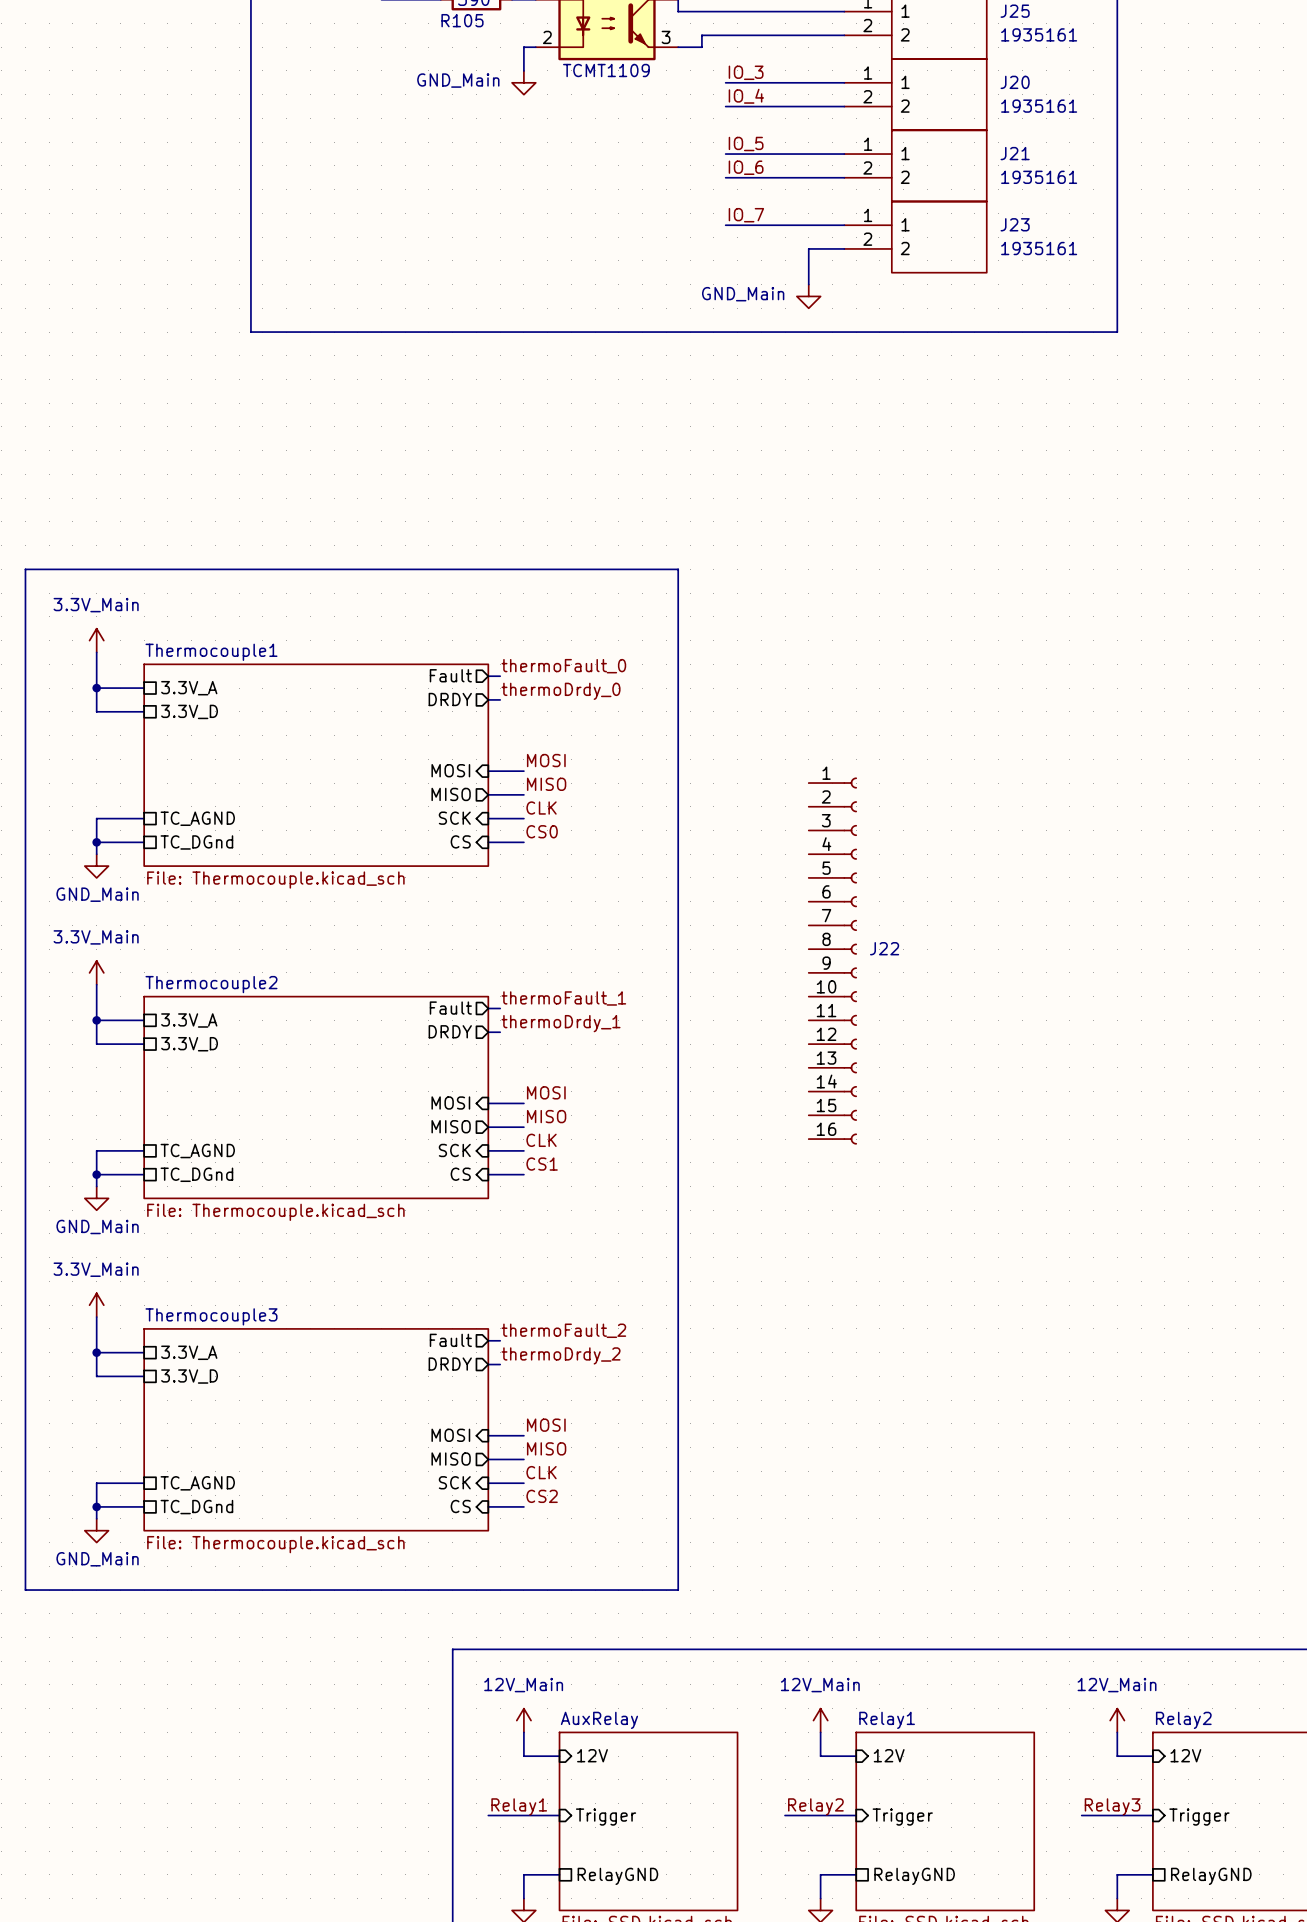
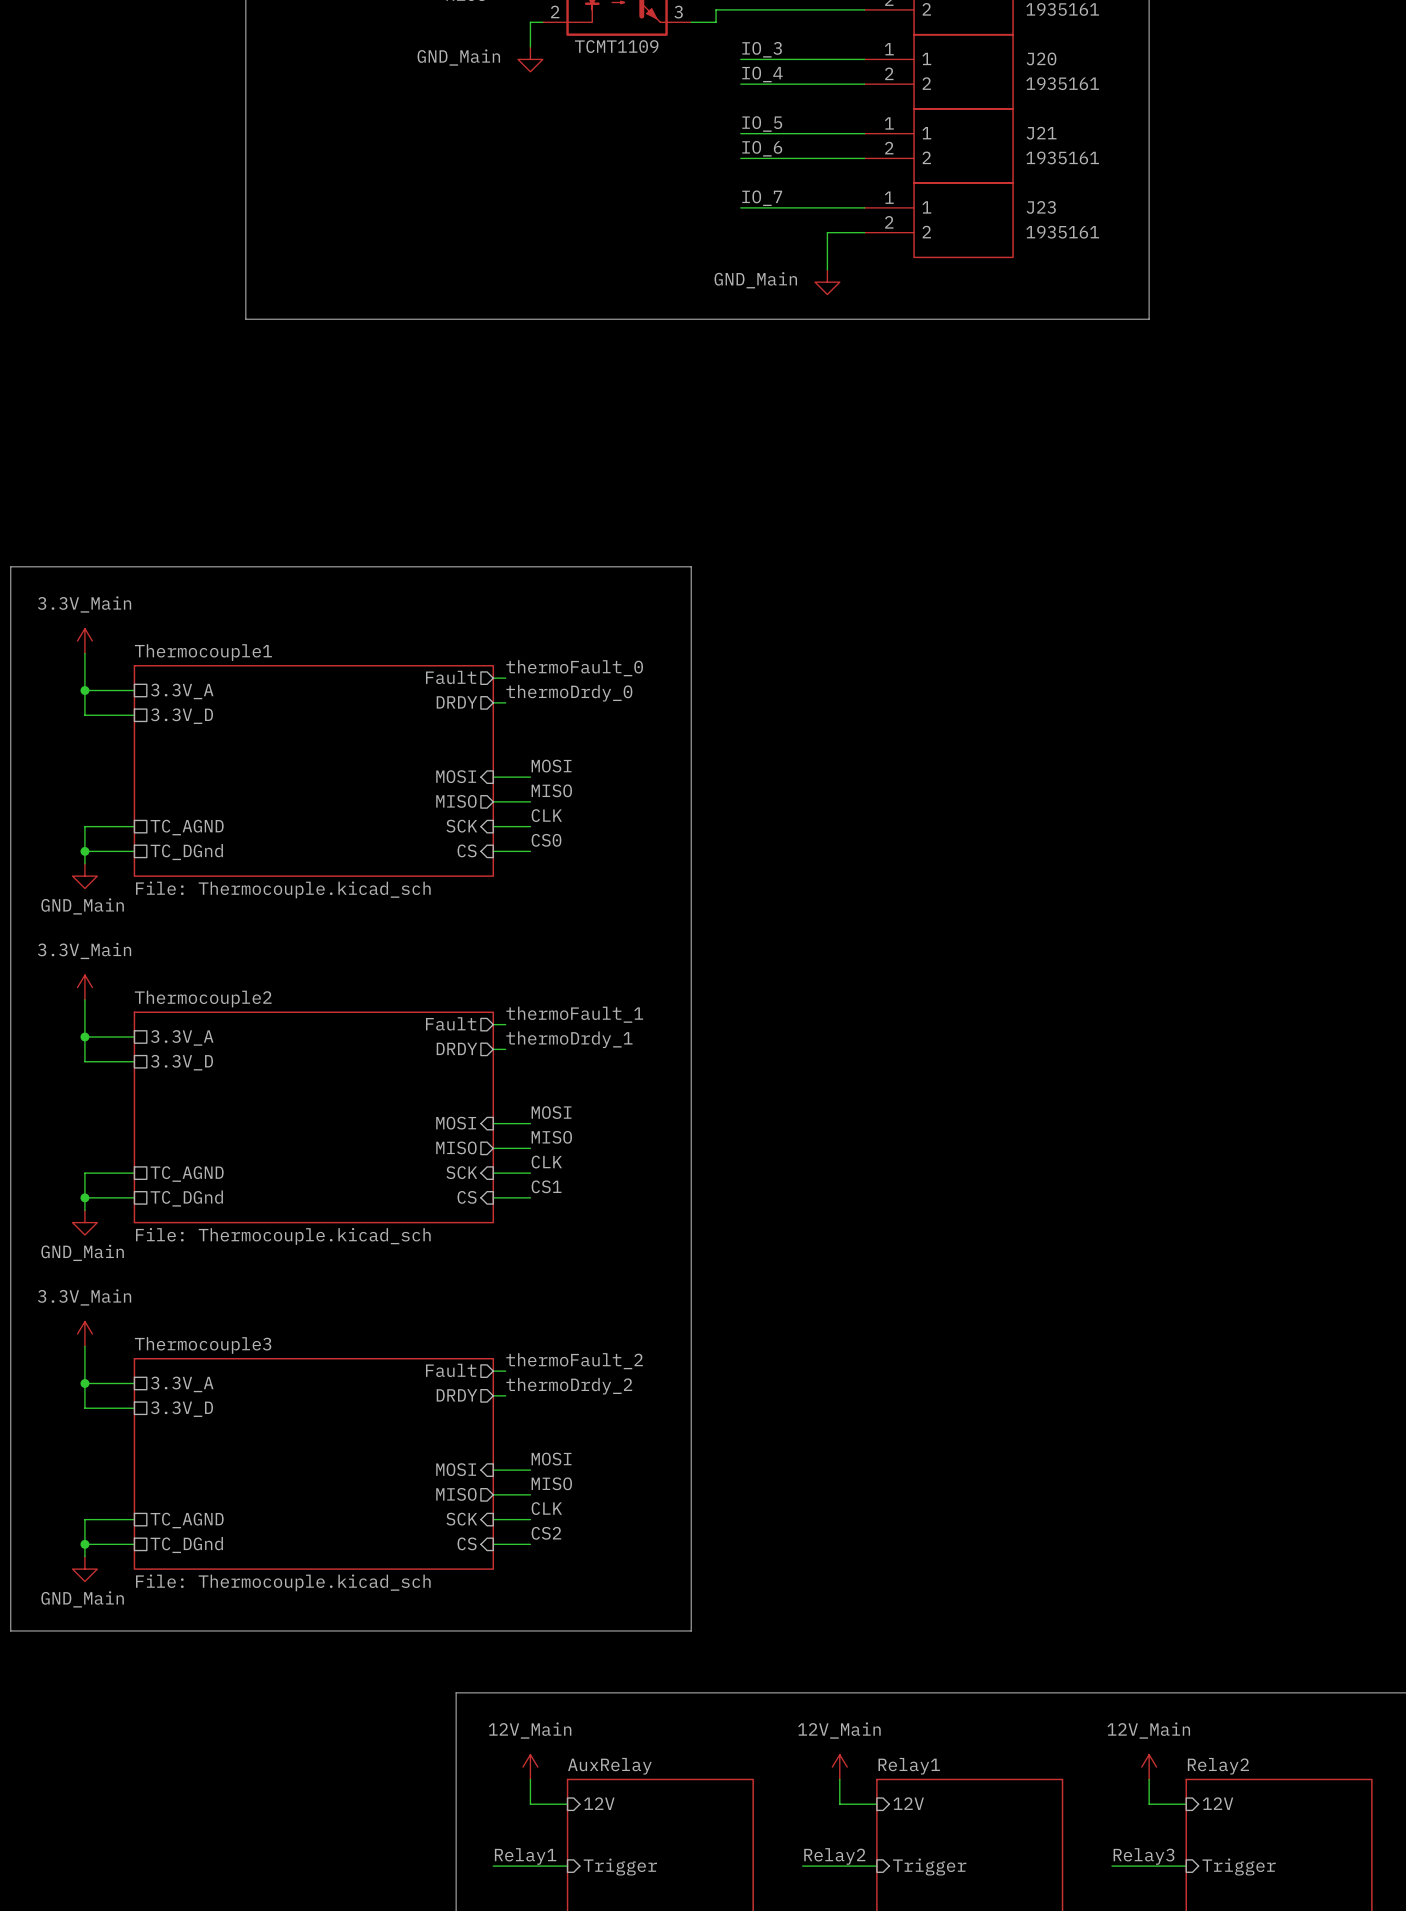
J22: (832, 961) -> none

